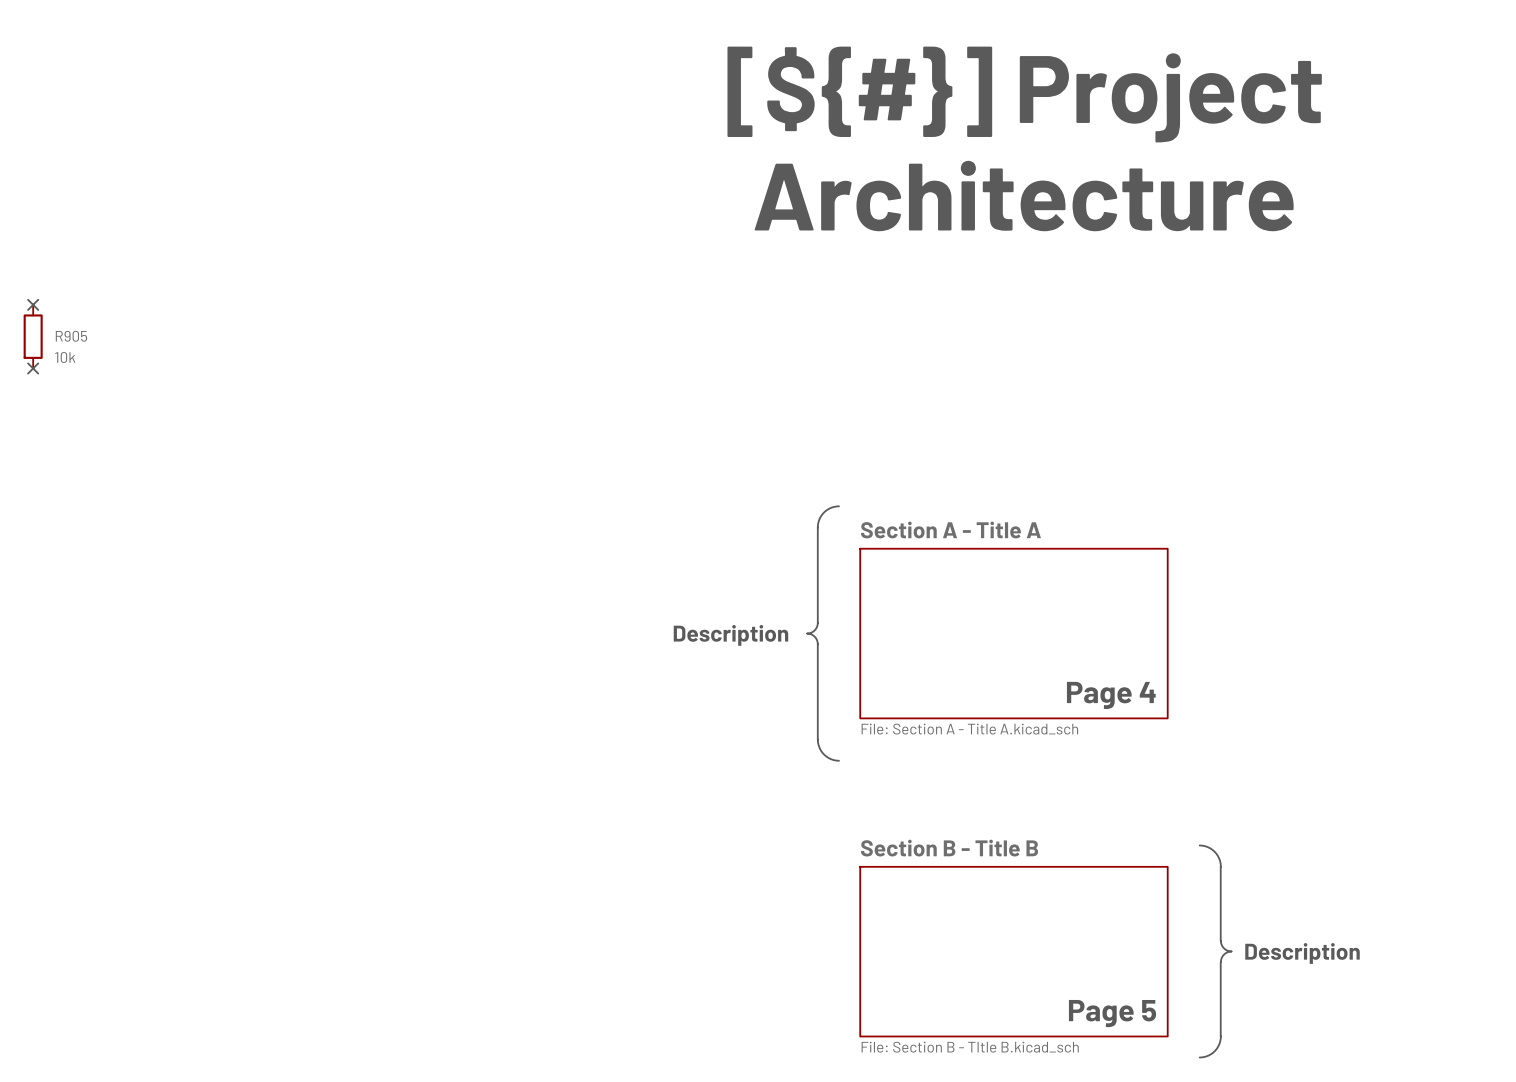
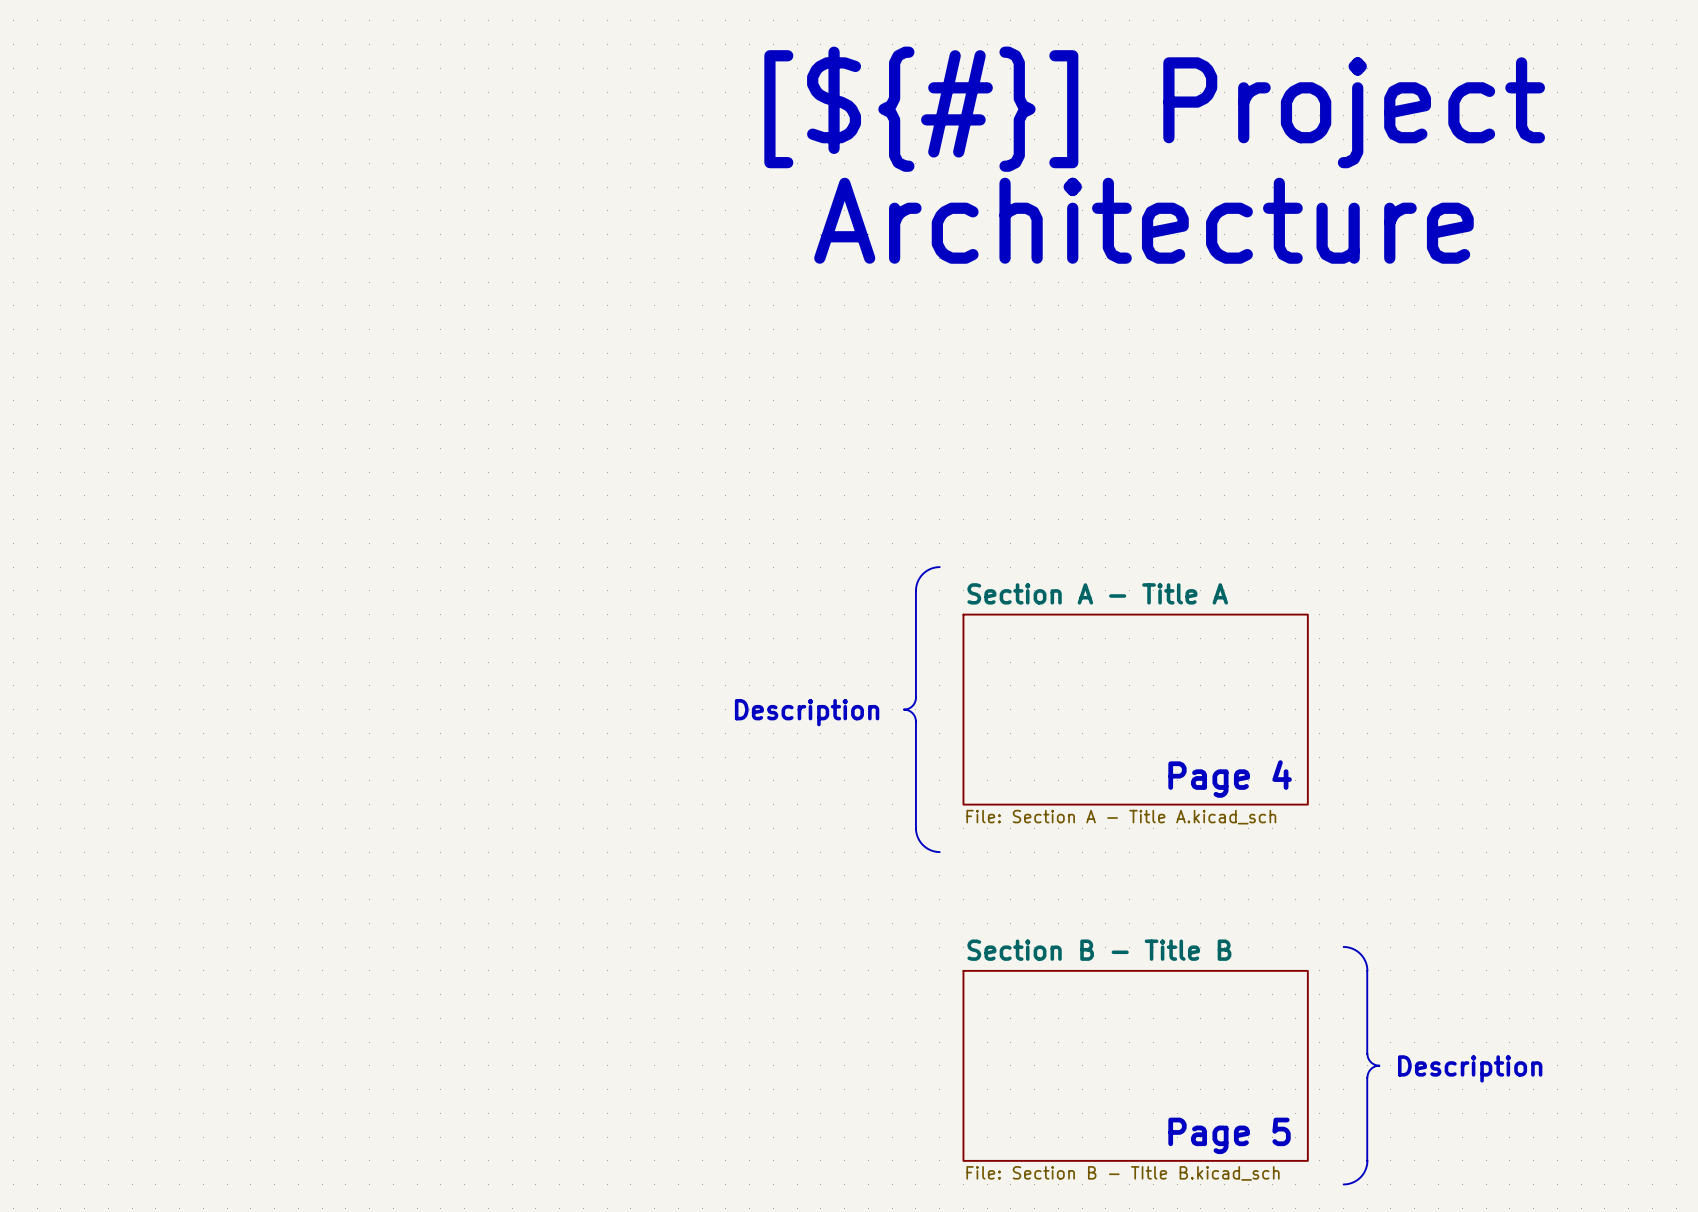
no-connect mark: (33, 304) -> none
R905: 10k (33, 336) -> none
no-connect mark: (33, 368) -> none

